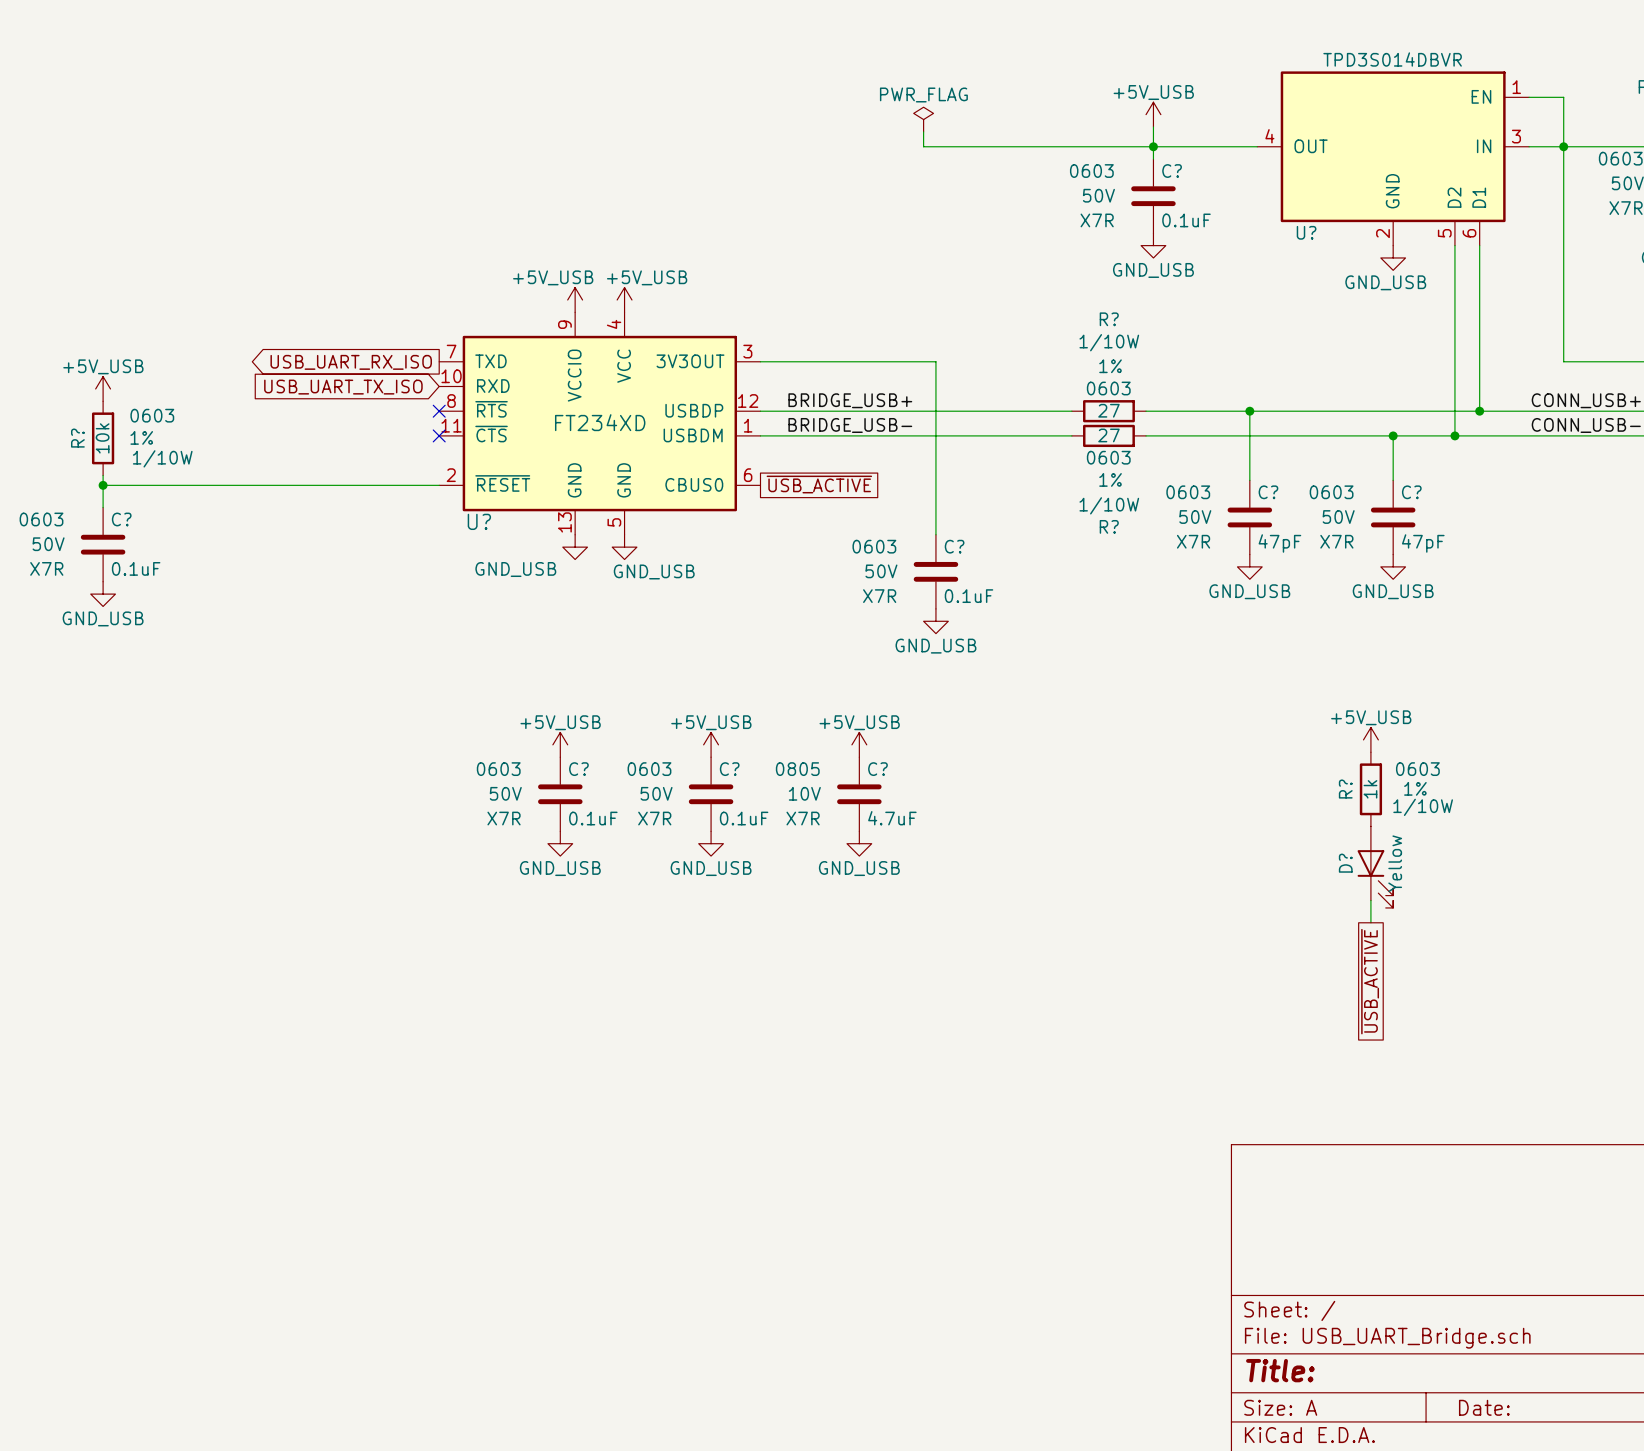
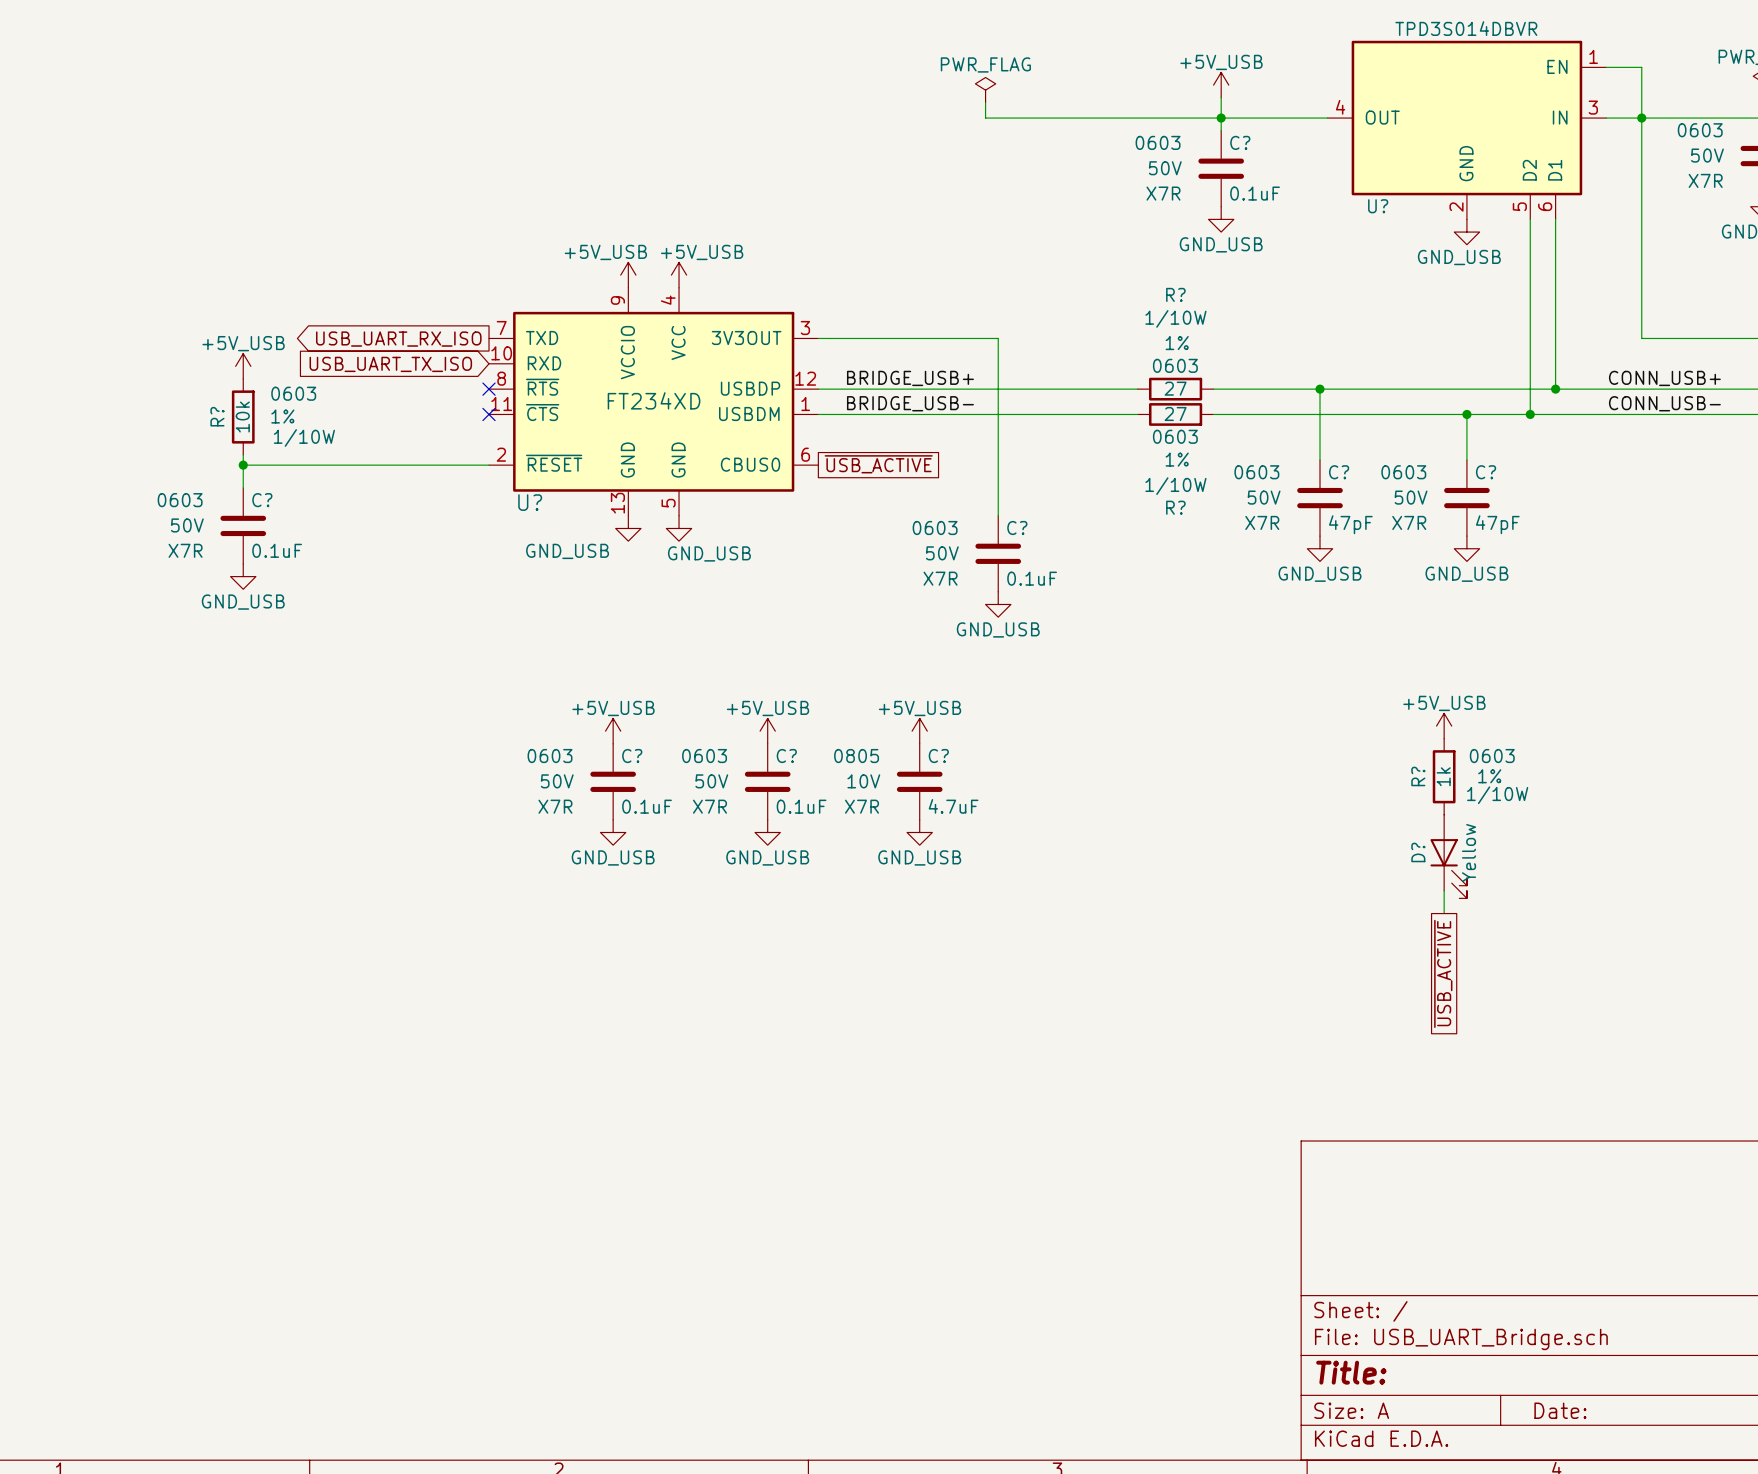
power symbol position: +5V_USB (103, 388) -> +5V_USB (243, 366)
R? position: (103, 438) -> (243, 417)
wire: (103, 475) (103, 507) -> (243, 455) (243, 487)
wire: (103, 485) (199, 485) -> none
junction: (103, 485) -> none
junction: none -> (243, 465)
C? position: (103, 544) -> (243, 525)
power symbol position: GND_USB (103, 594) -> GND_USB (243, 576)

